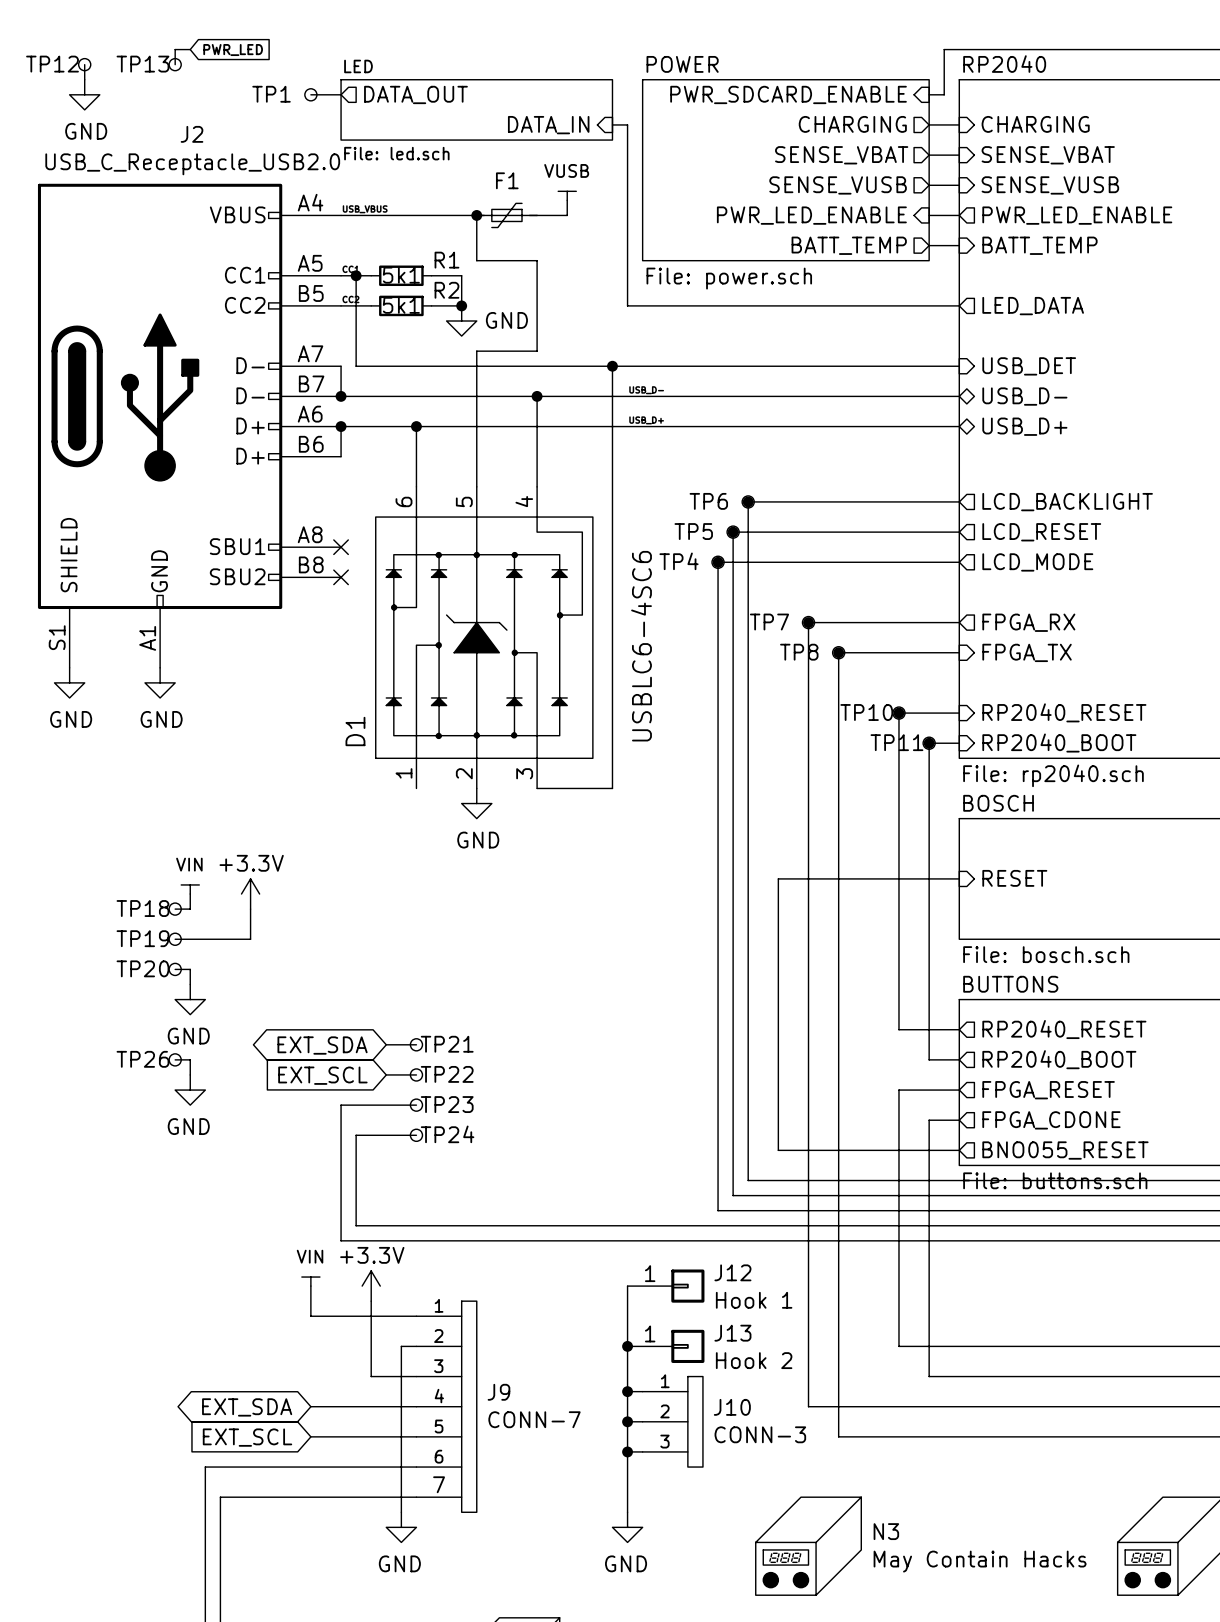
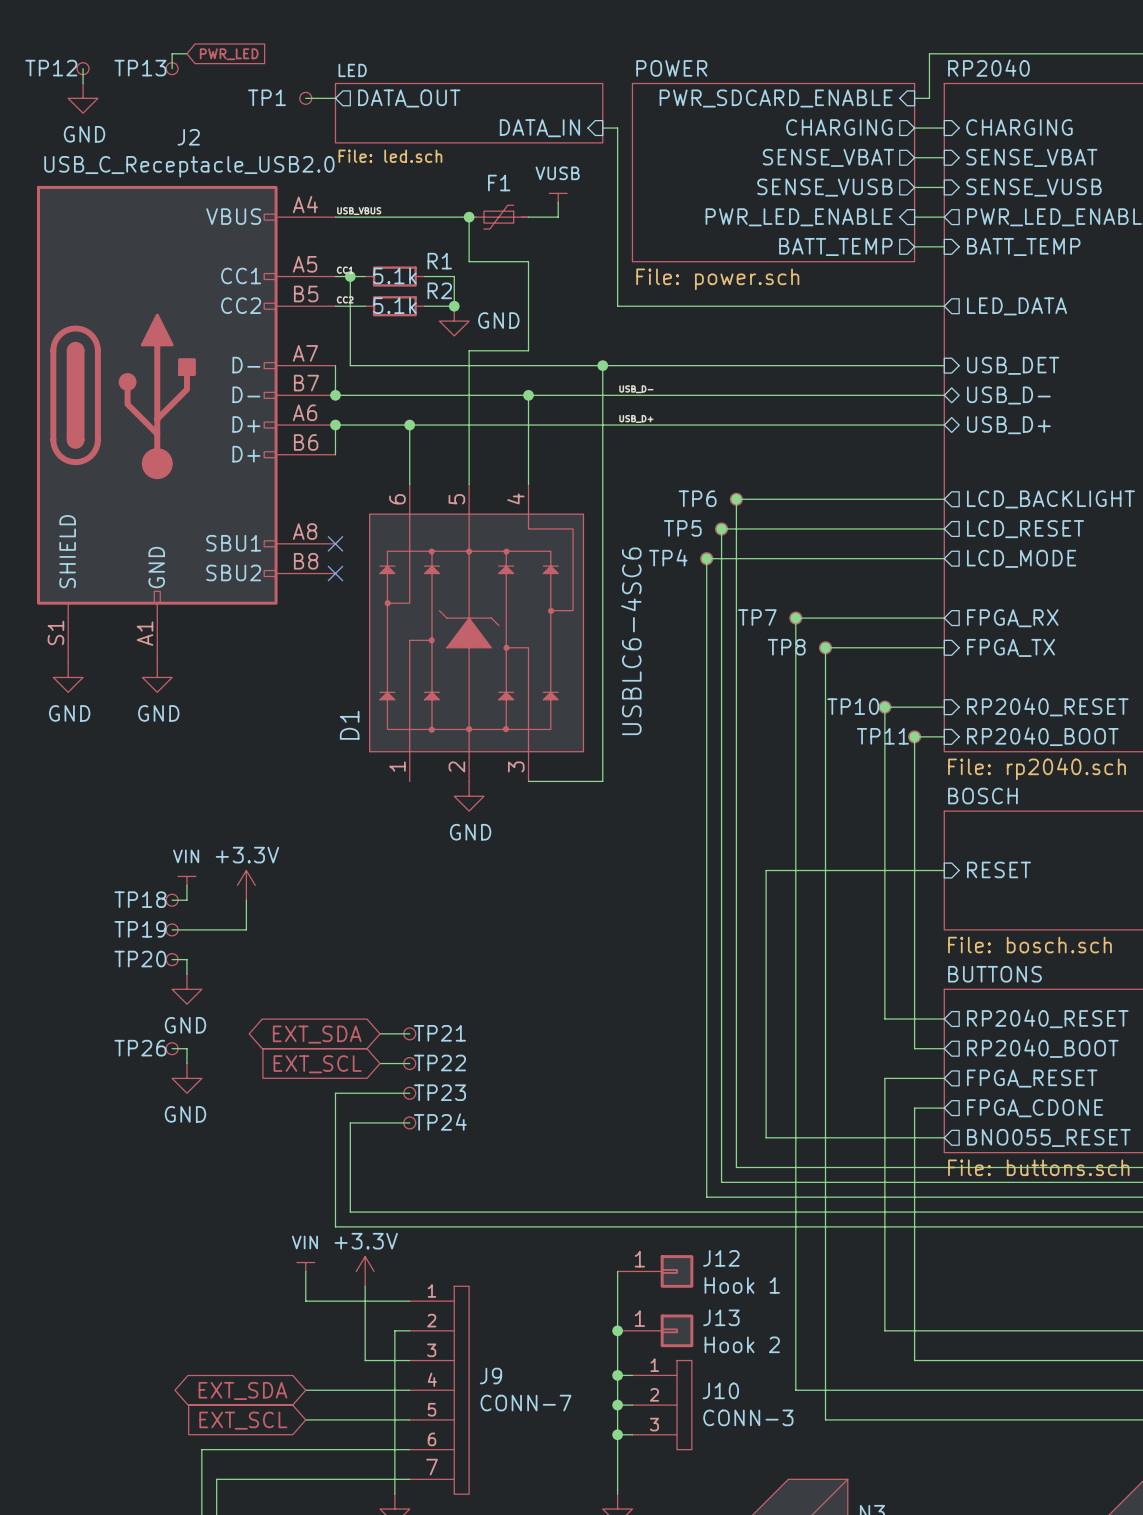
R1 value: 5k1 (401, 275) -> 5.1k (394, 275)
R2 value: 5k1 (401, 305) -> 5.1k (394, 305)

